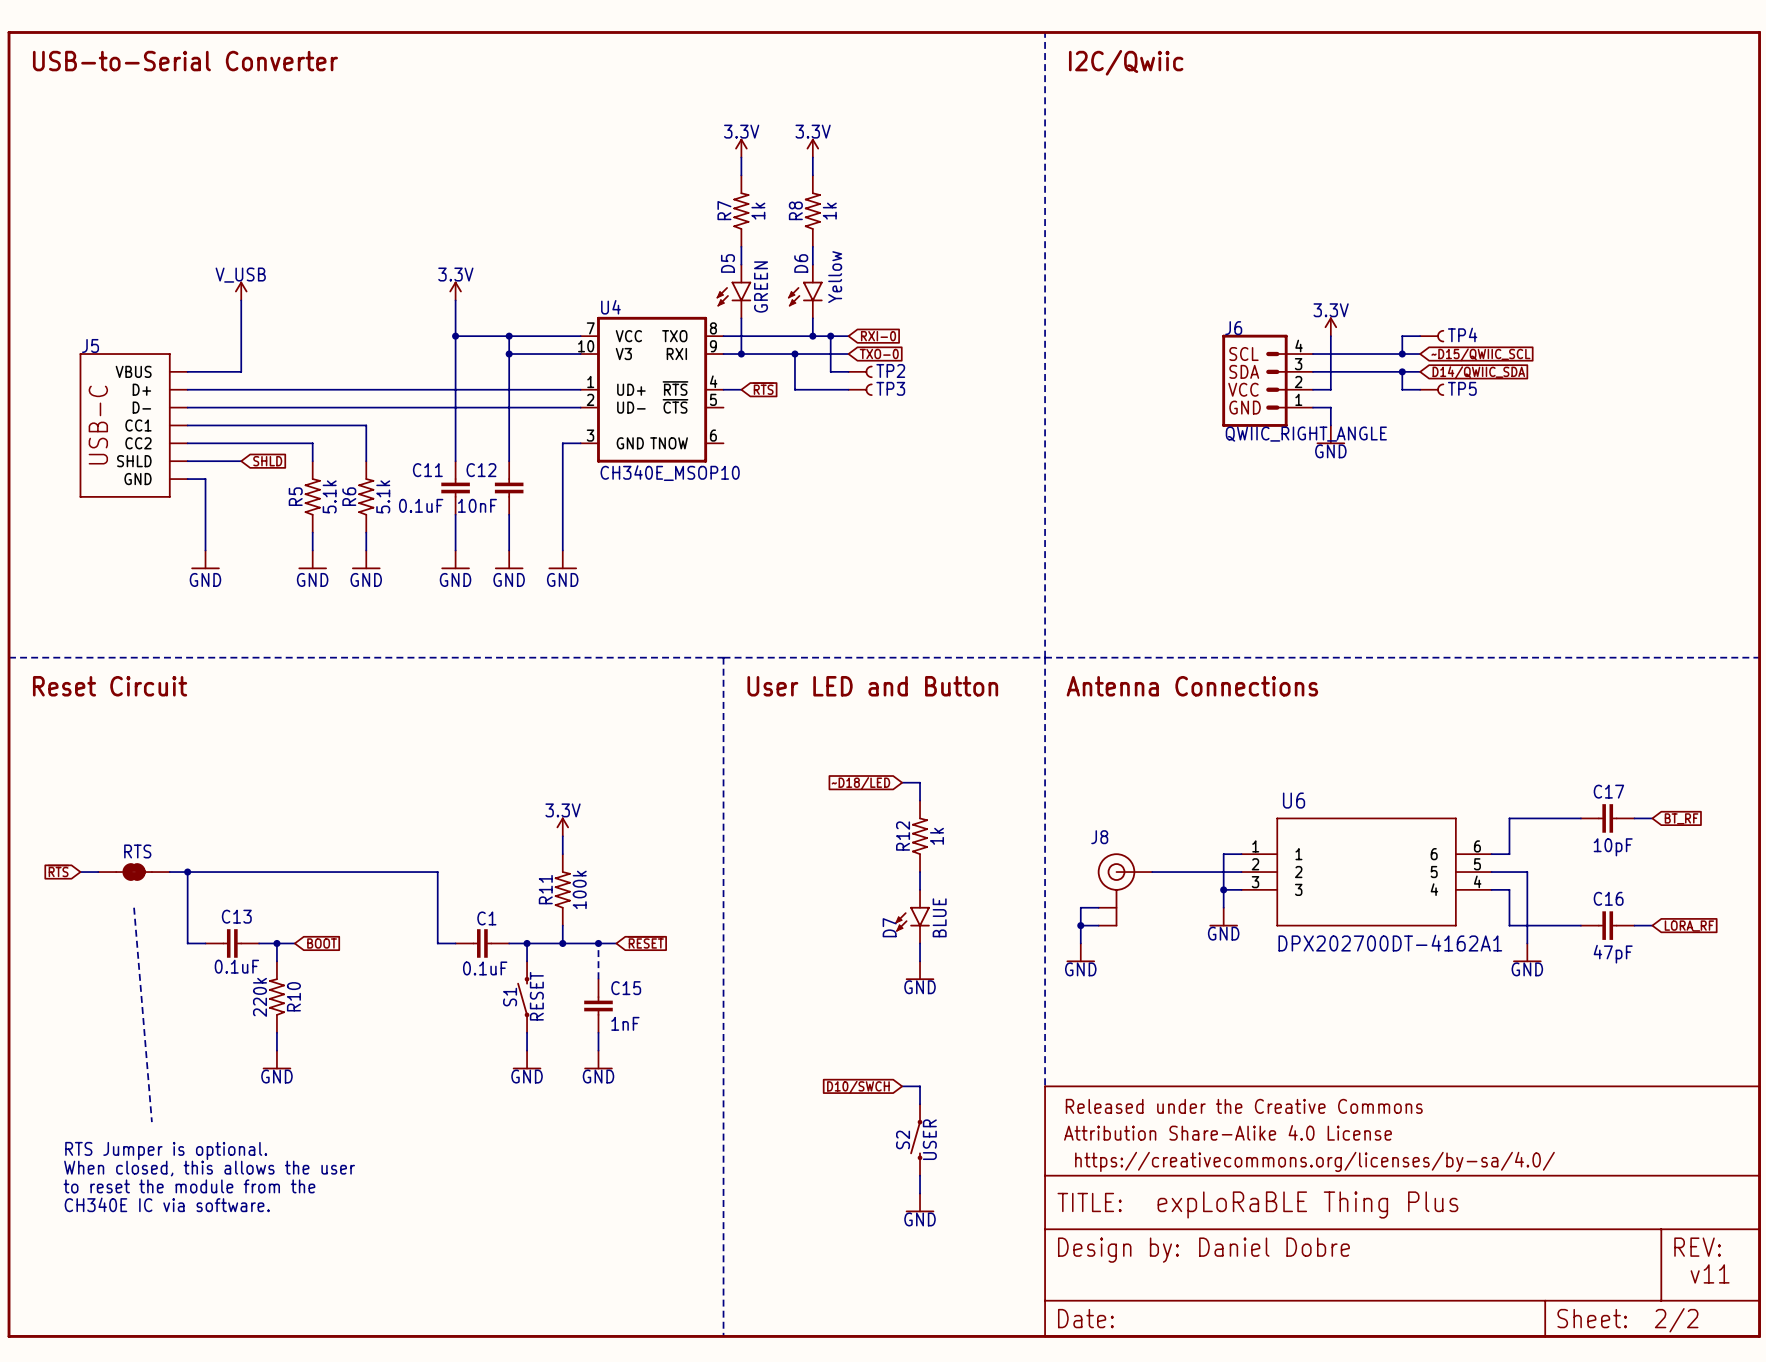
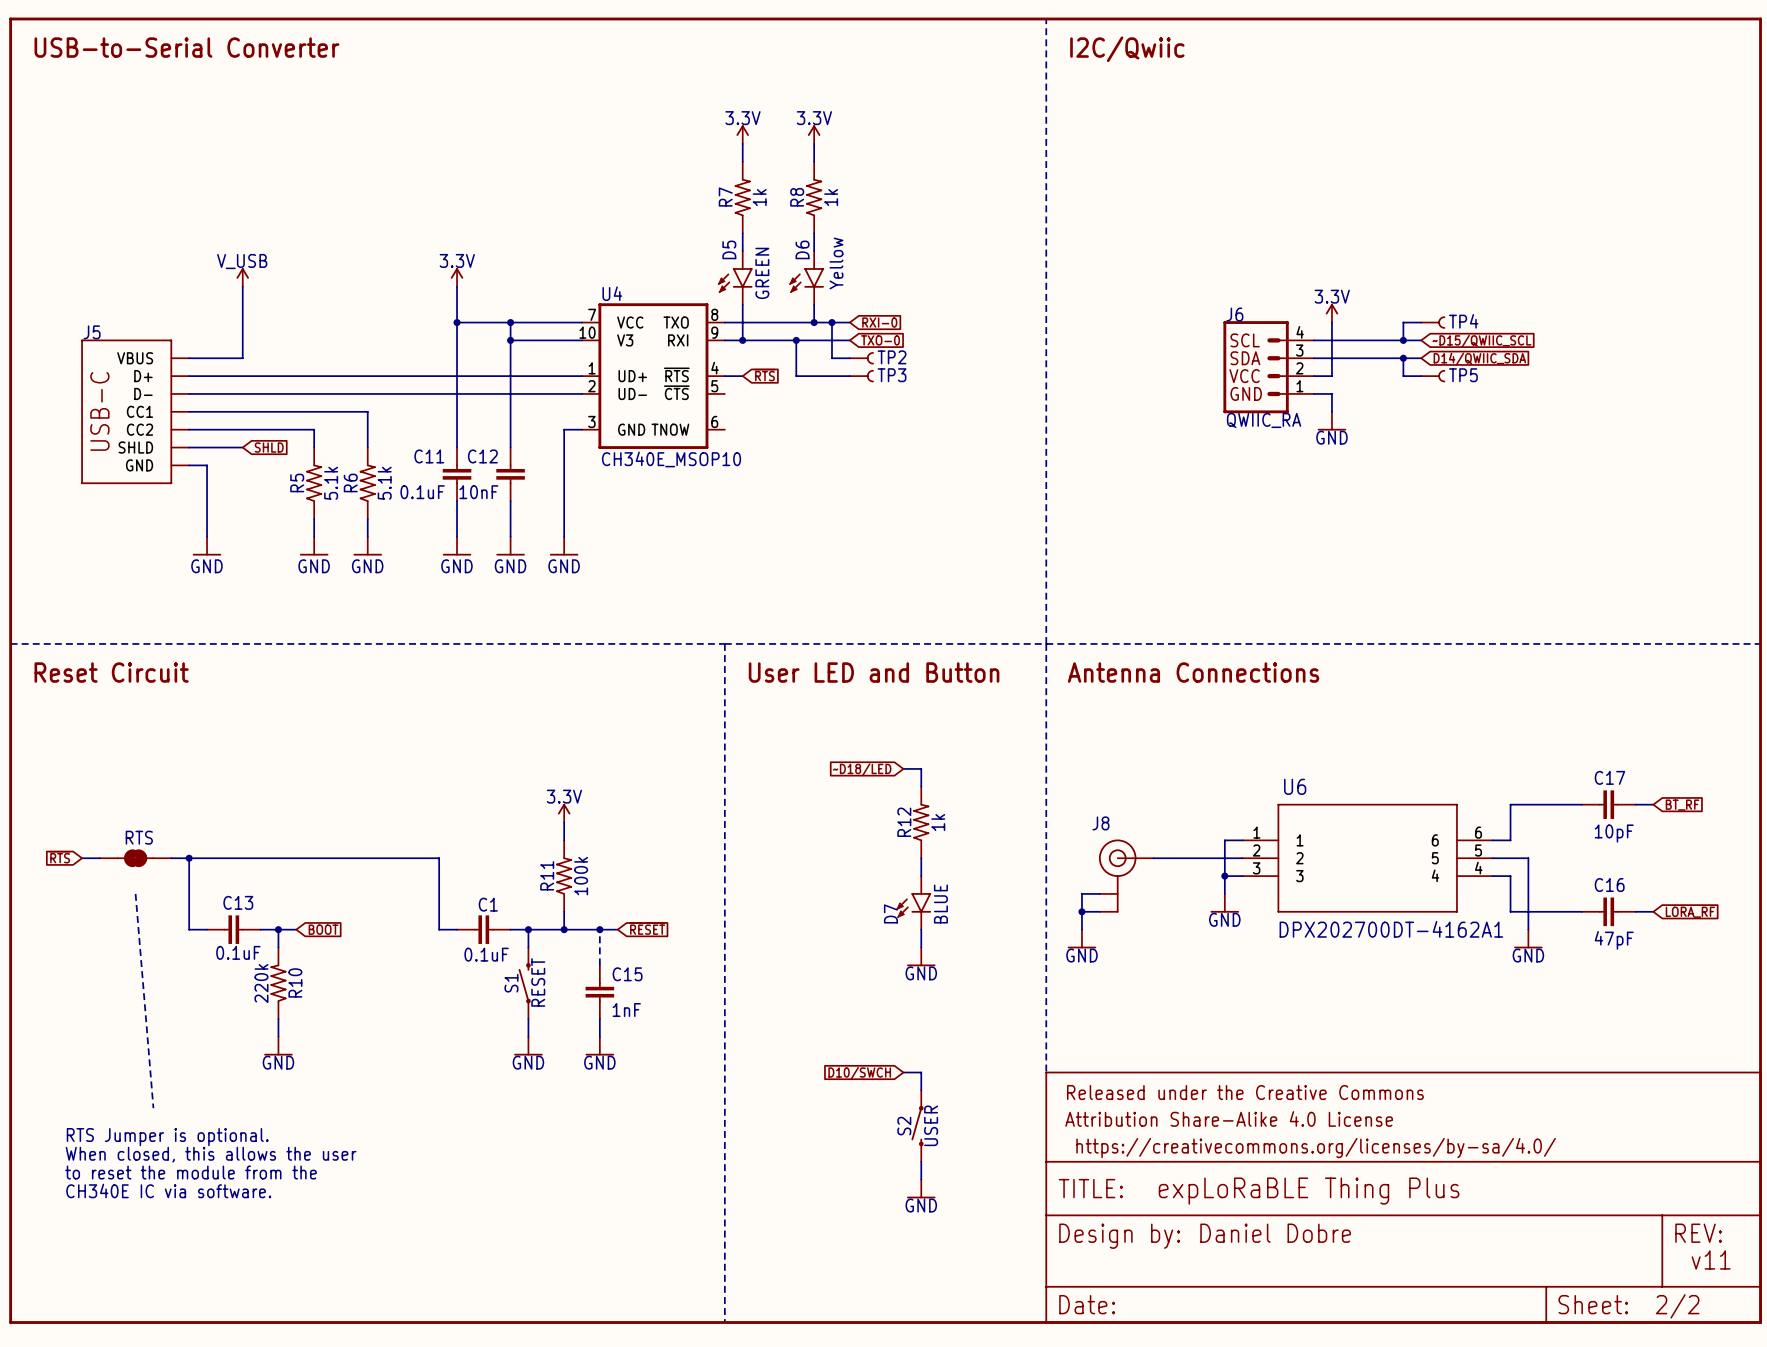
J6 value: QWIIC_RIGHT_ANGLE (1306, 434) -> QWIIC_RA (1264, 420)

